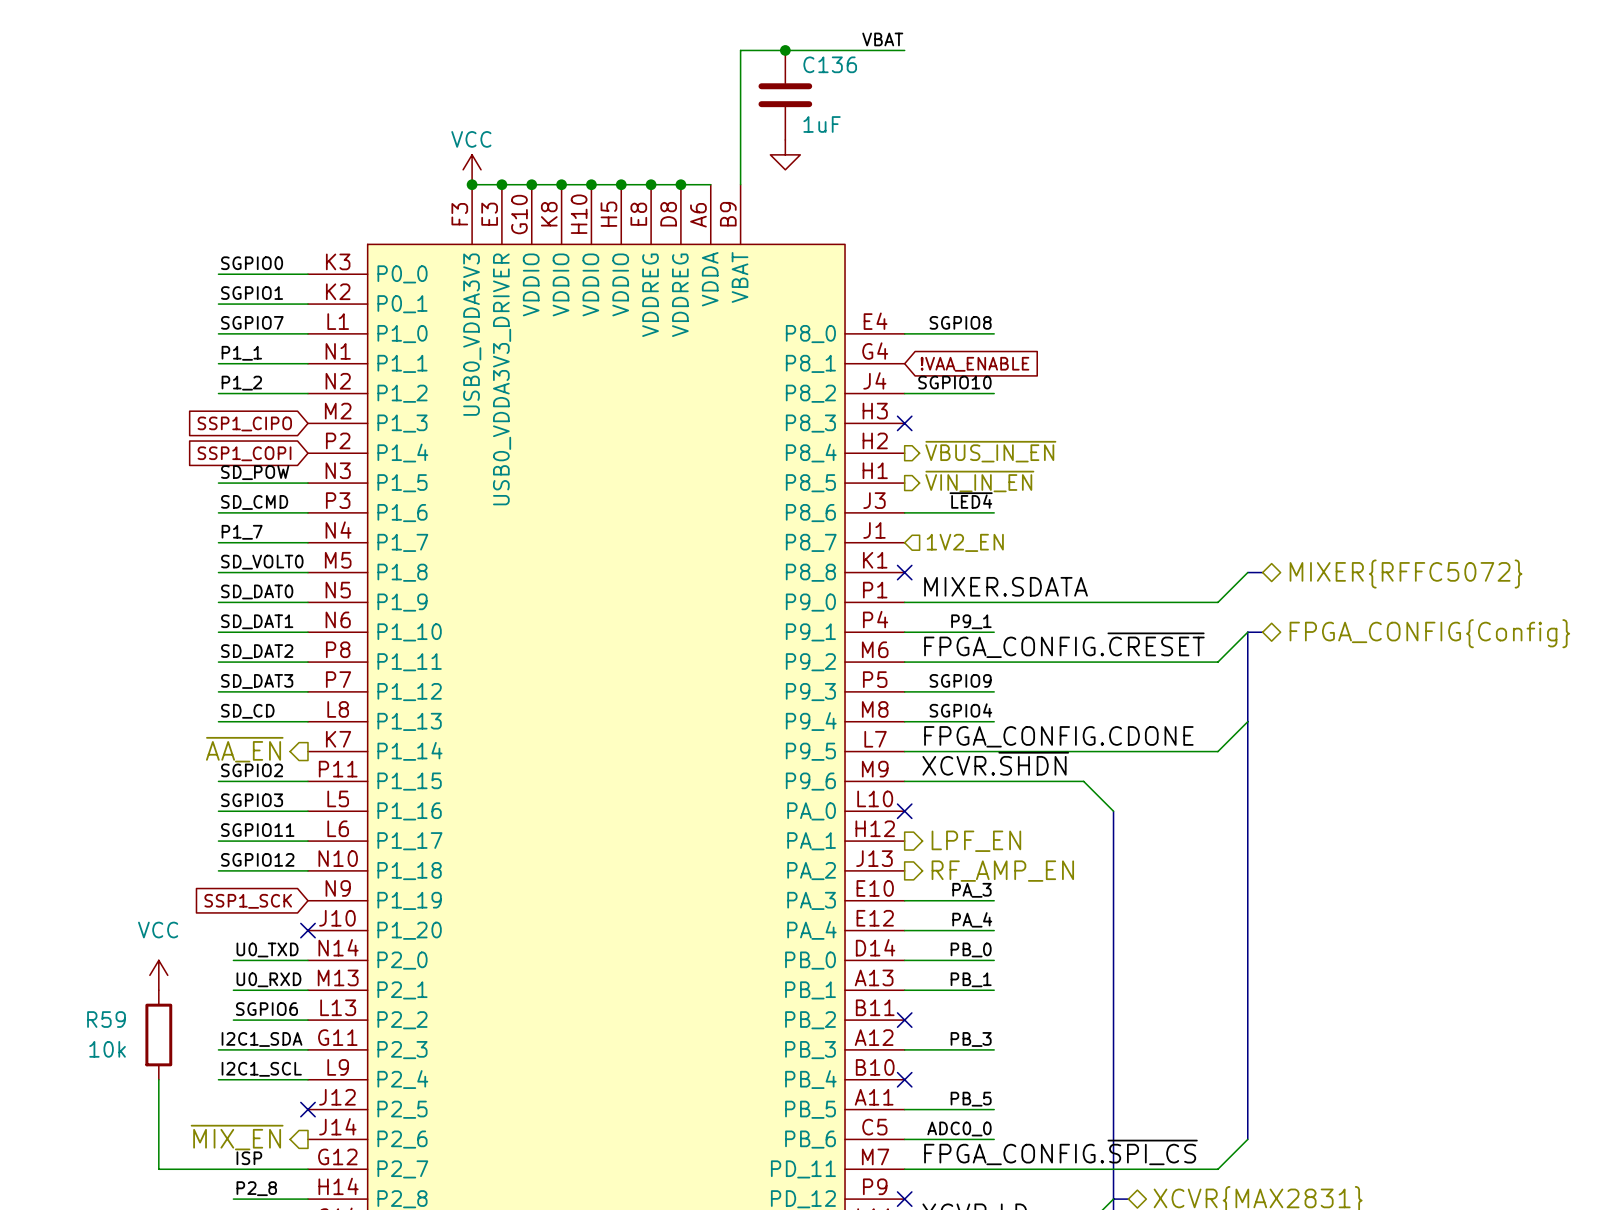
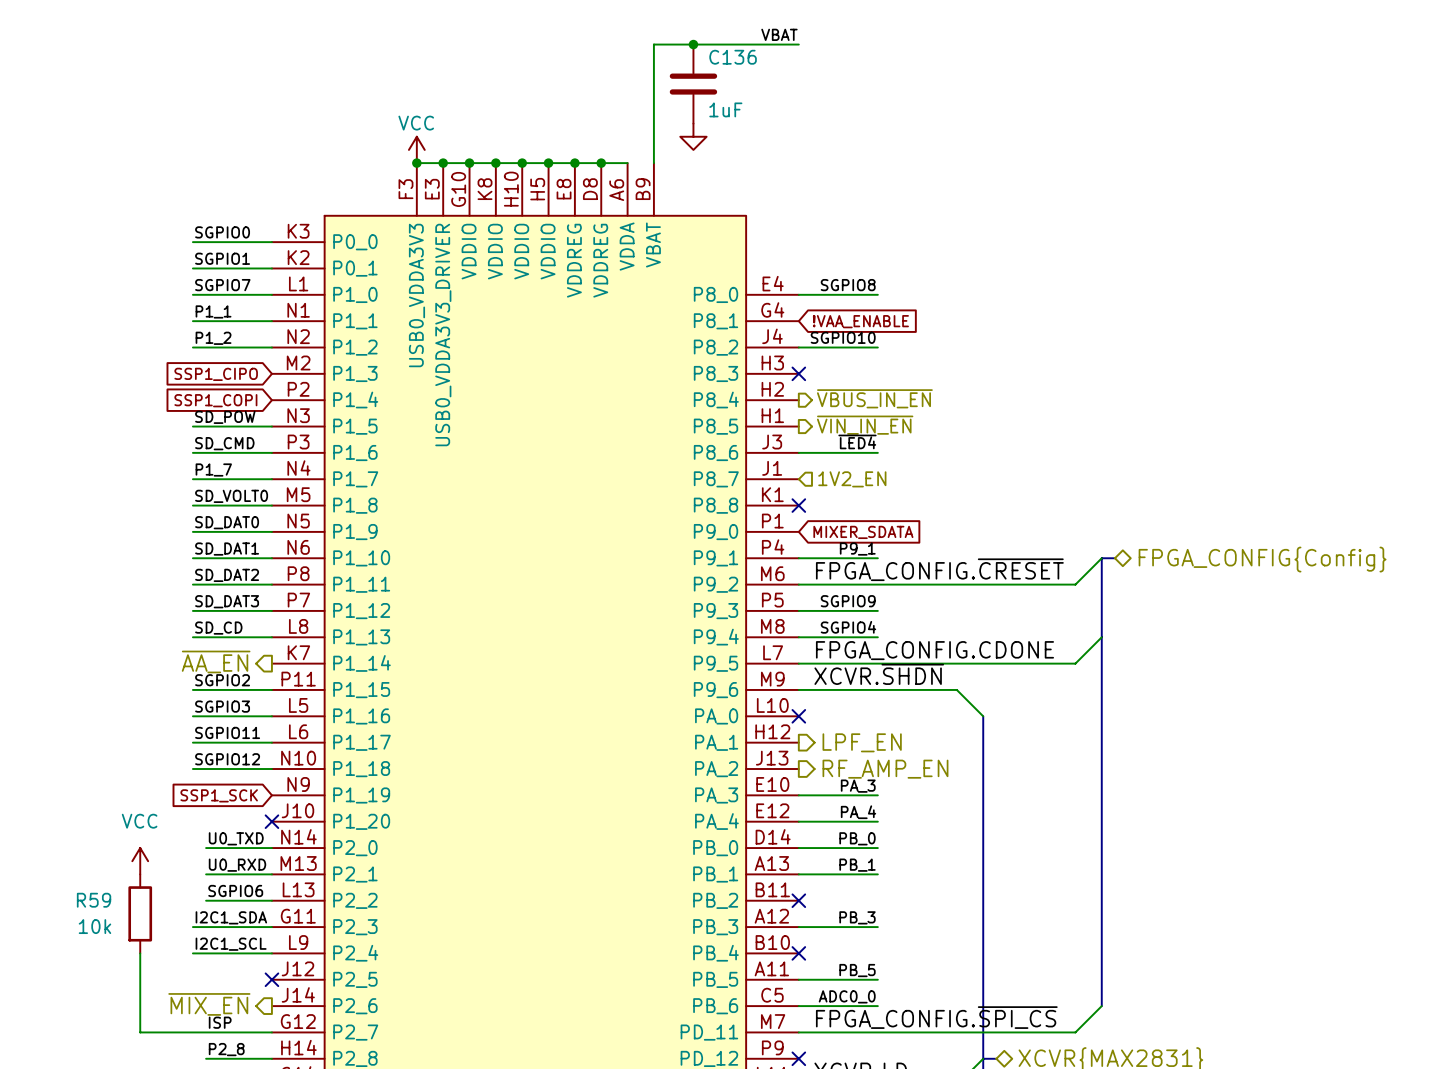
wire: (1247, 572) (1217, 602) (904, 602) -> none
bus: (1247, 572) (1262, 572) -> none
hierarchical label: MIXER{RFFC5072} (1406, 574) -> none
label: MIXER.SDATA (1006, 586) -> none
global label: none -> MIXER_SDATA (863, 532)

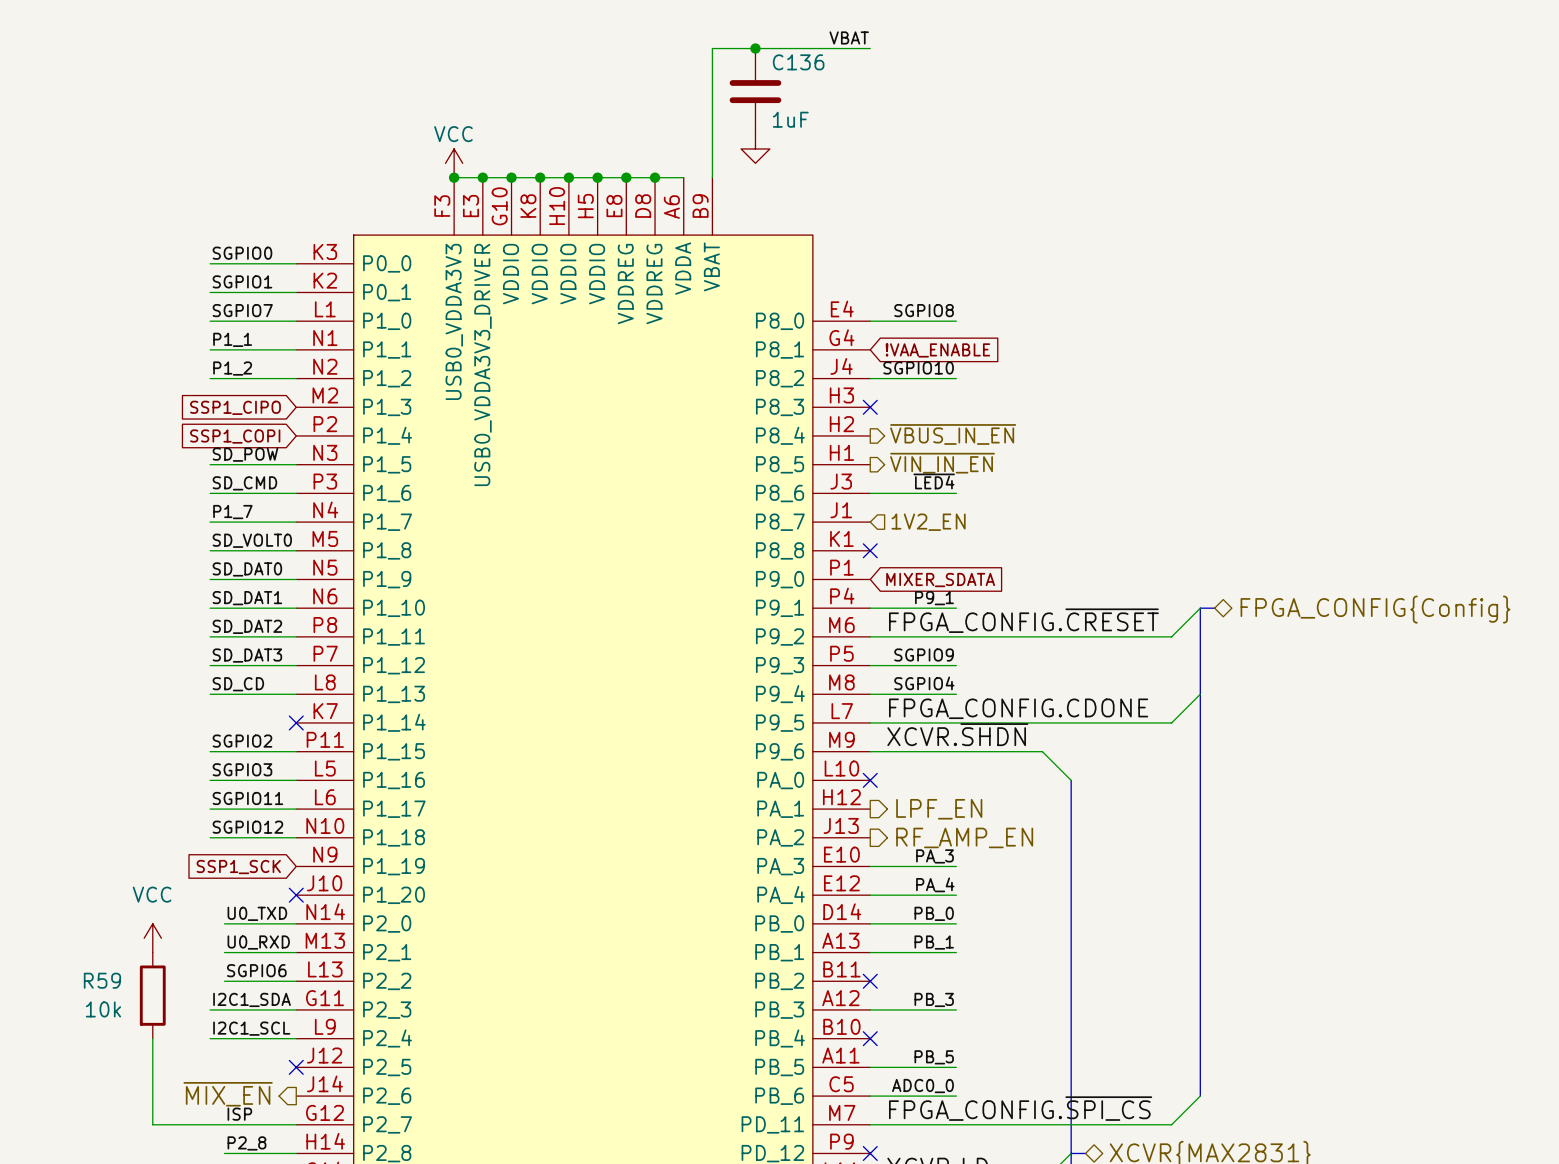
hierarchical label: ~{AA_EN} (216, 661) -> none
no-connect mark: none -> (296, 722)

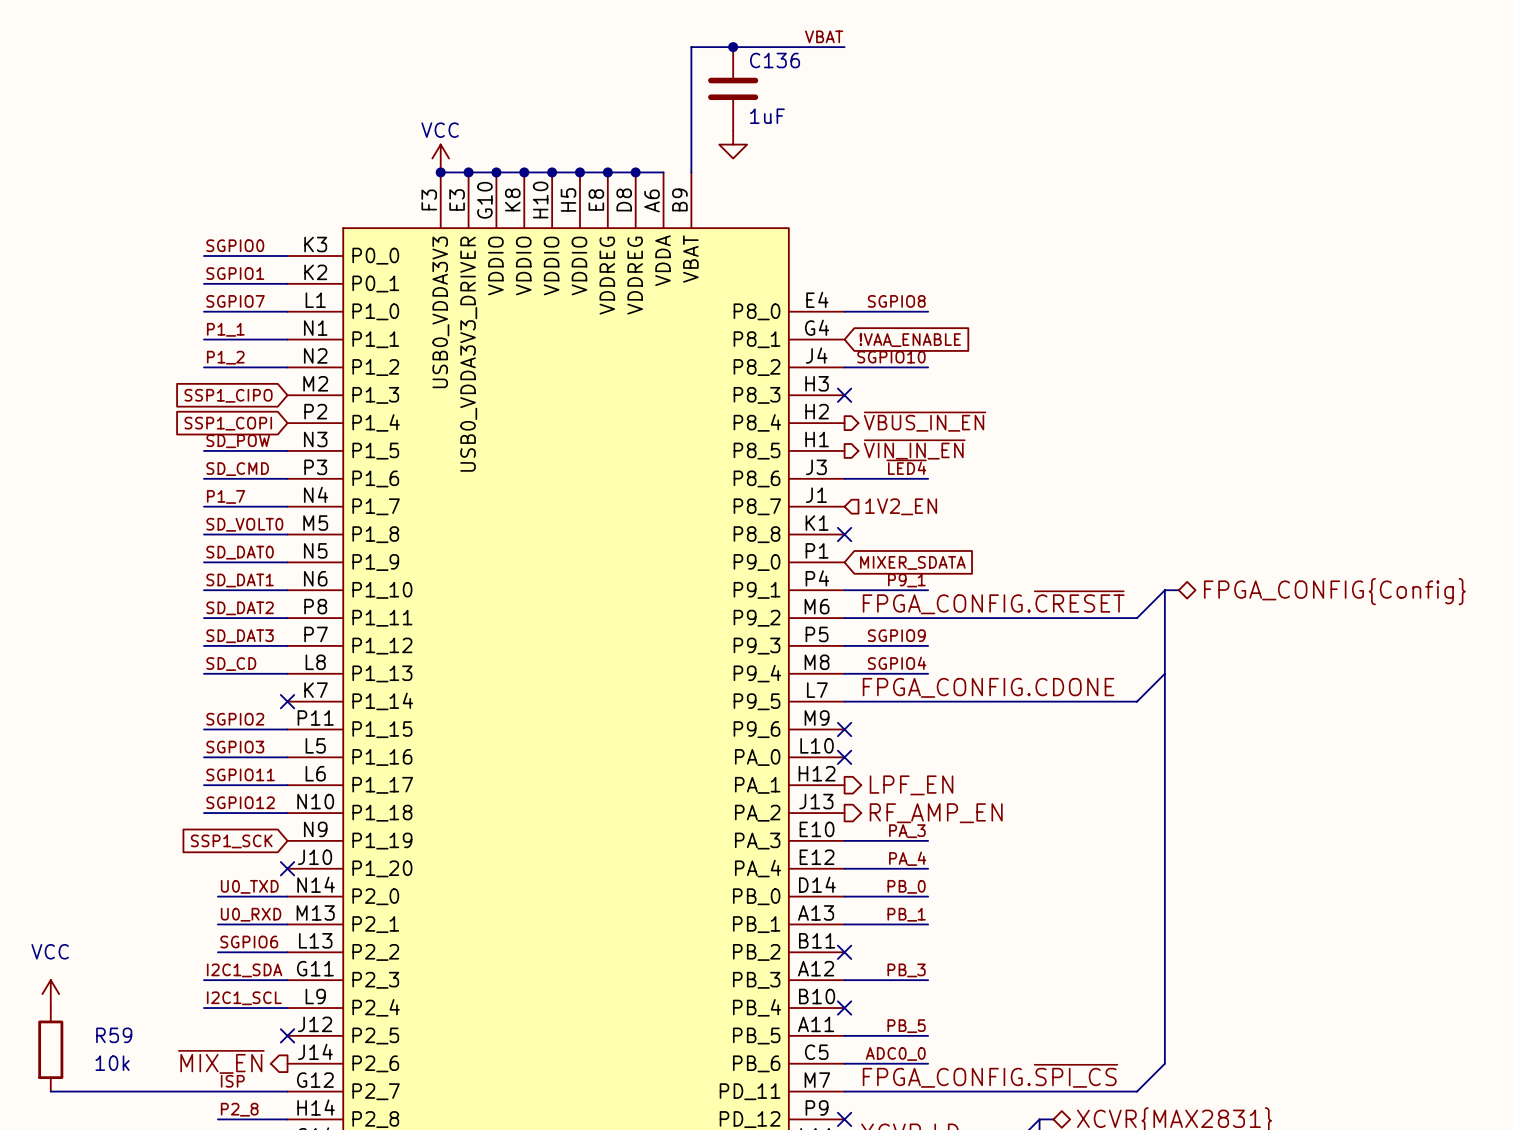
label: XCVR.~{SHDN} (957, 734) -> none
wire: (870, 751) (1042, 751) (1071, 780) -> none
no-connect mark: none -> (844, 729)
bus: (1071, 780) (1071, 1153) -> none
power symbol position: VCC (152, 938) -> VCC (50, 994)
R59 name position: R59 (102, 980) -> R59 (114, 1035)
R59 position: (152, 995) -> (50, 1049)
R59 value position: 10k (103, 1009) -> 10k (112, 1063)
wire: (152, 1038) (152, 1124) -> (50, 1091) (148, 1091)

